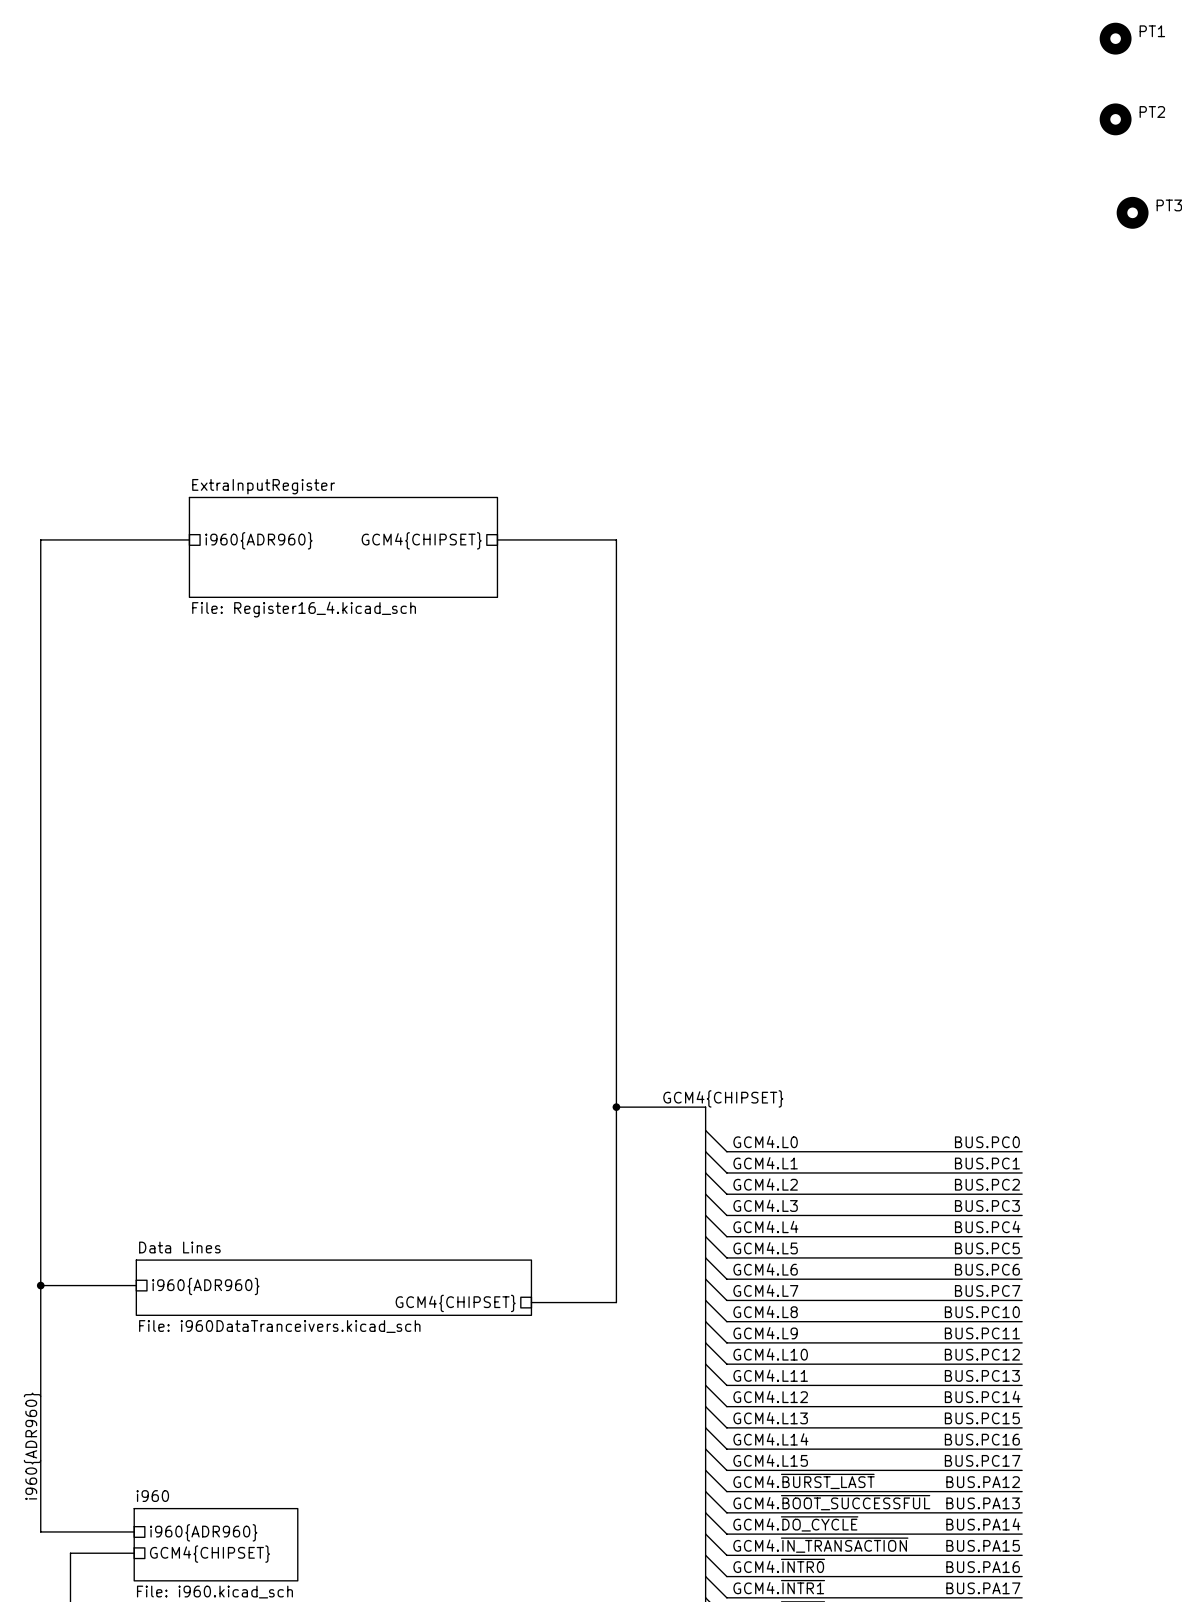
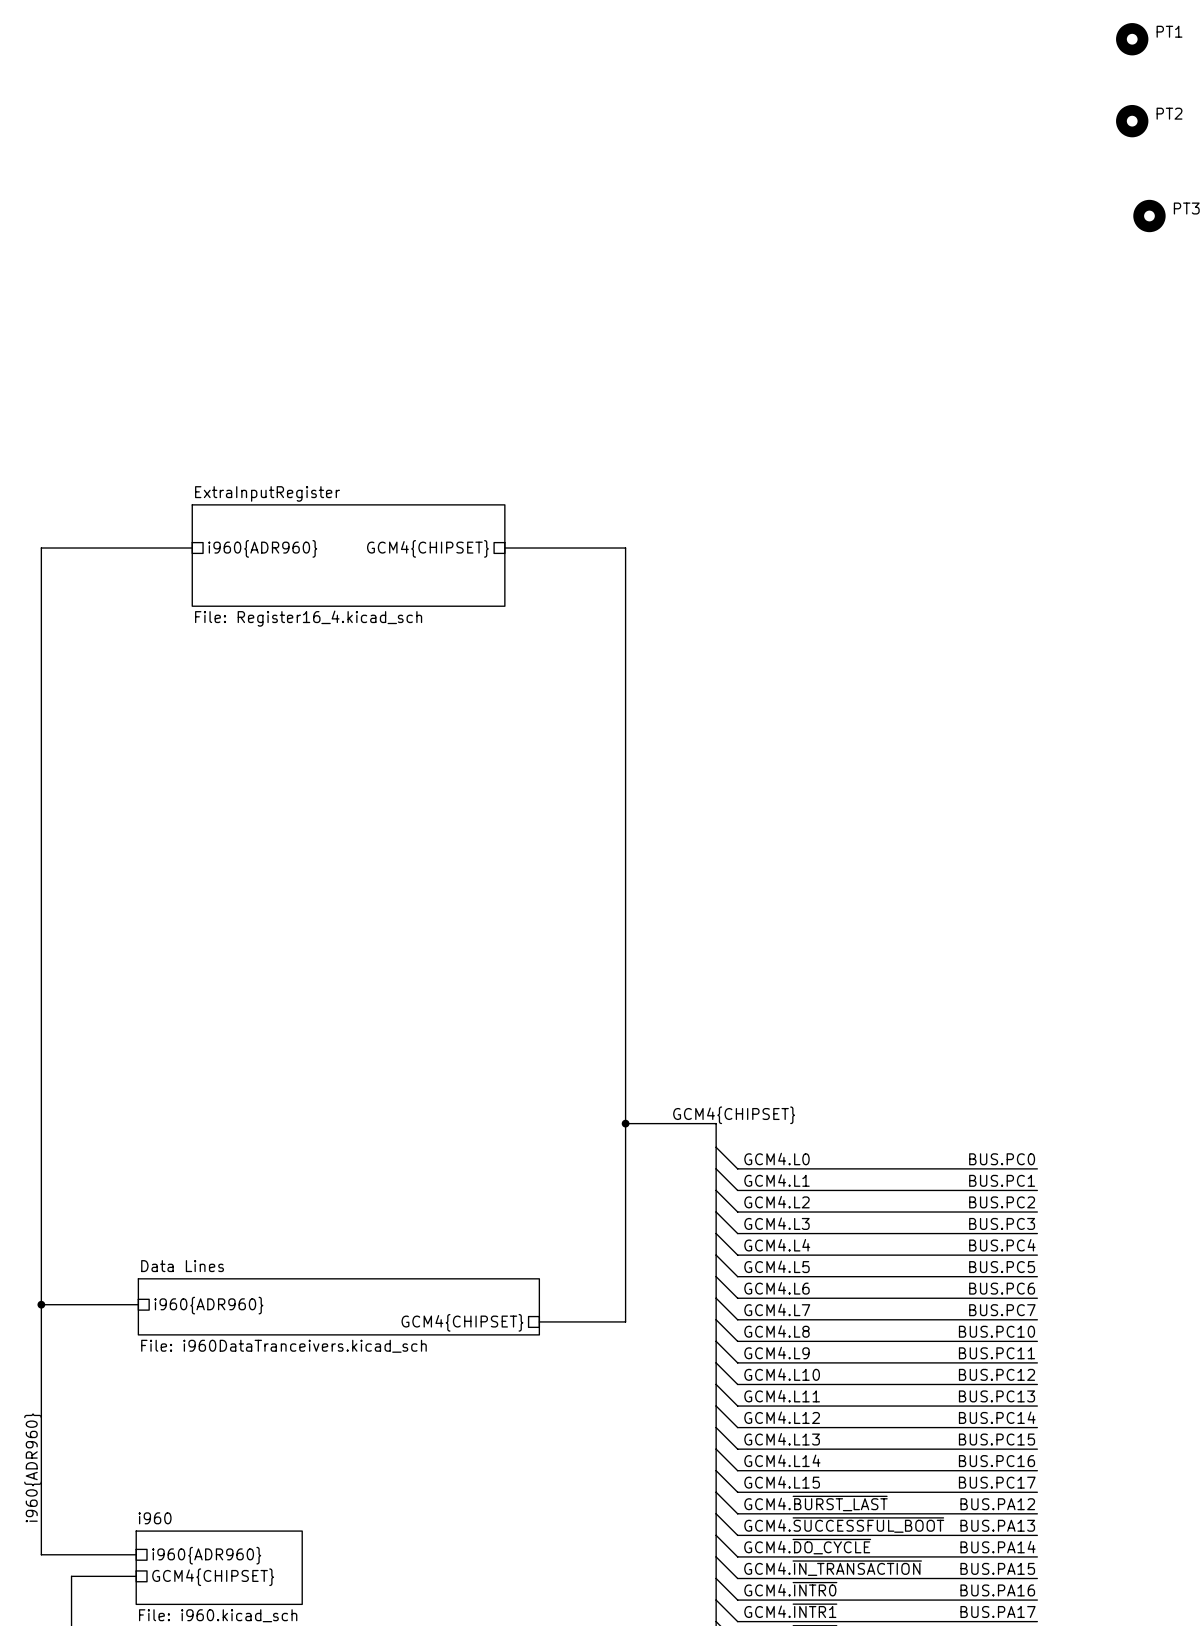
label: GCM4.~{BOOT_SUCCESSFUL} (831, 1502) -> GCM4.~{SUCCESSFUL_BOOT} (844, 1525)

